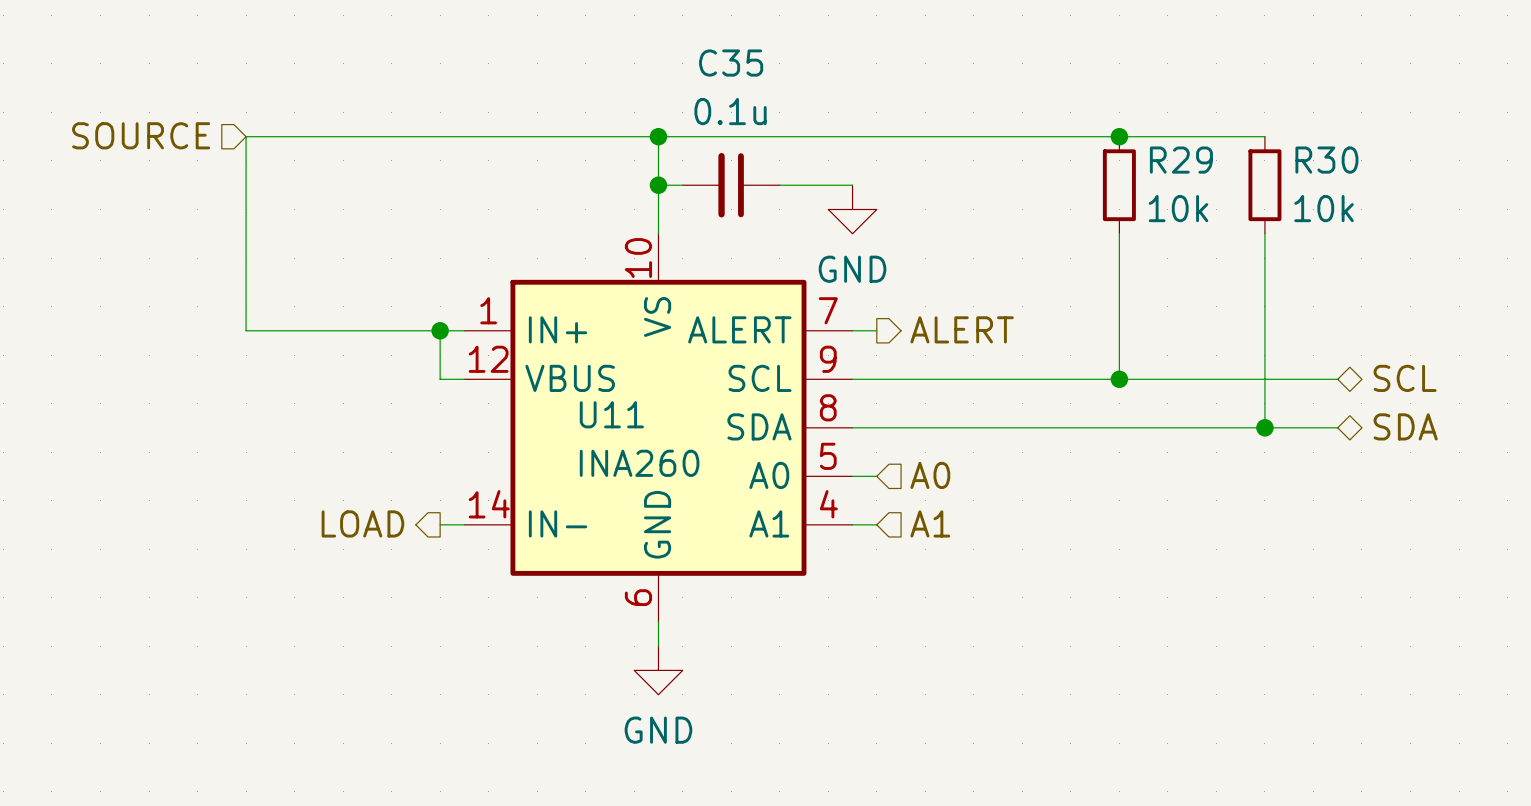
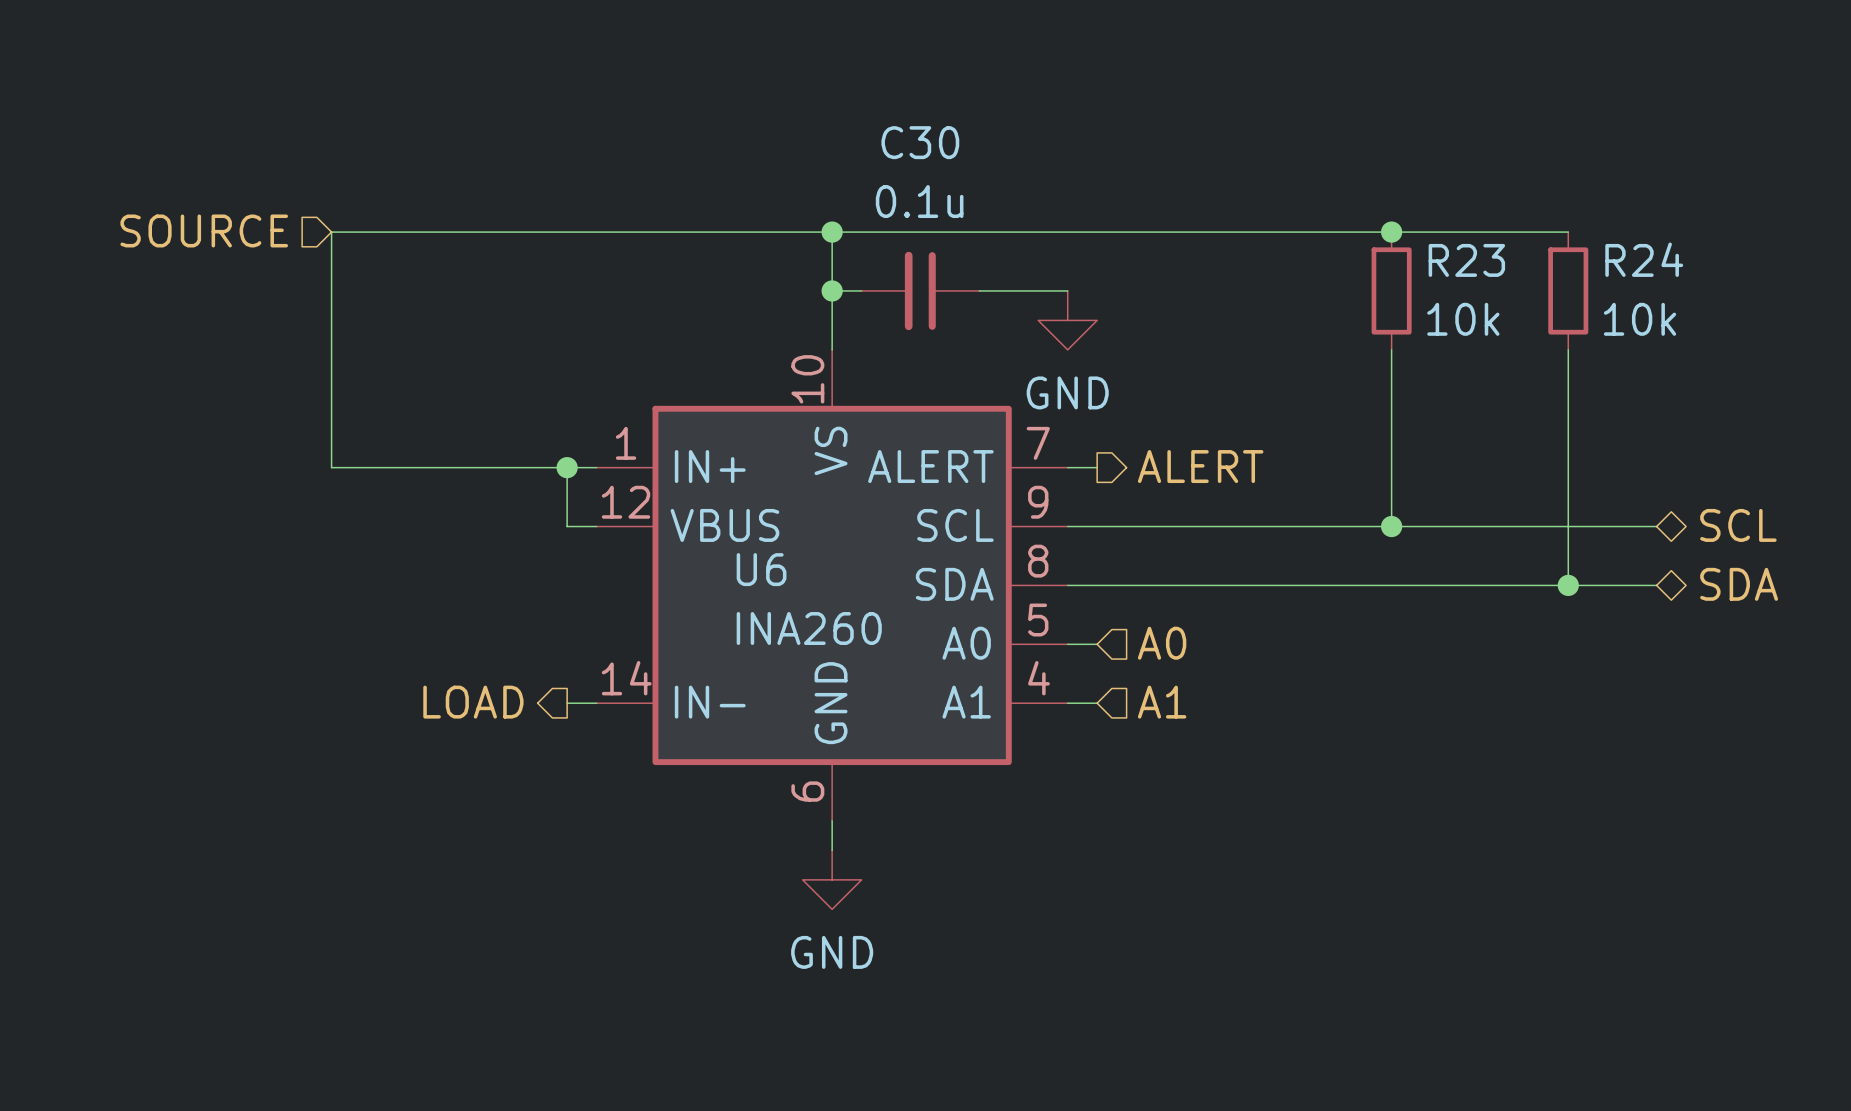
C35 name: C35 (731, 63) -> C30 (920, 142)
R29 name: R29 (1181, 160) -> R23 (1466, 260)
R30 name: R30 (1326, 160) -> R24 (1644, 259)
U11 name: U11 (611, 414) -> U6 (761, 569)

